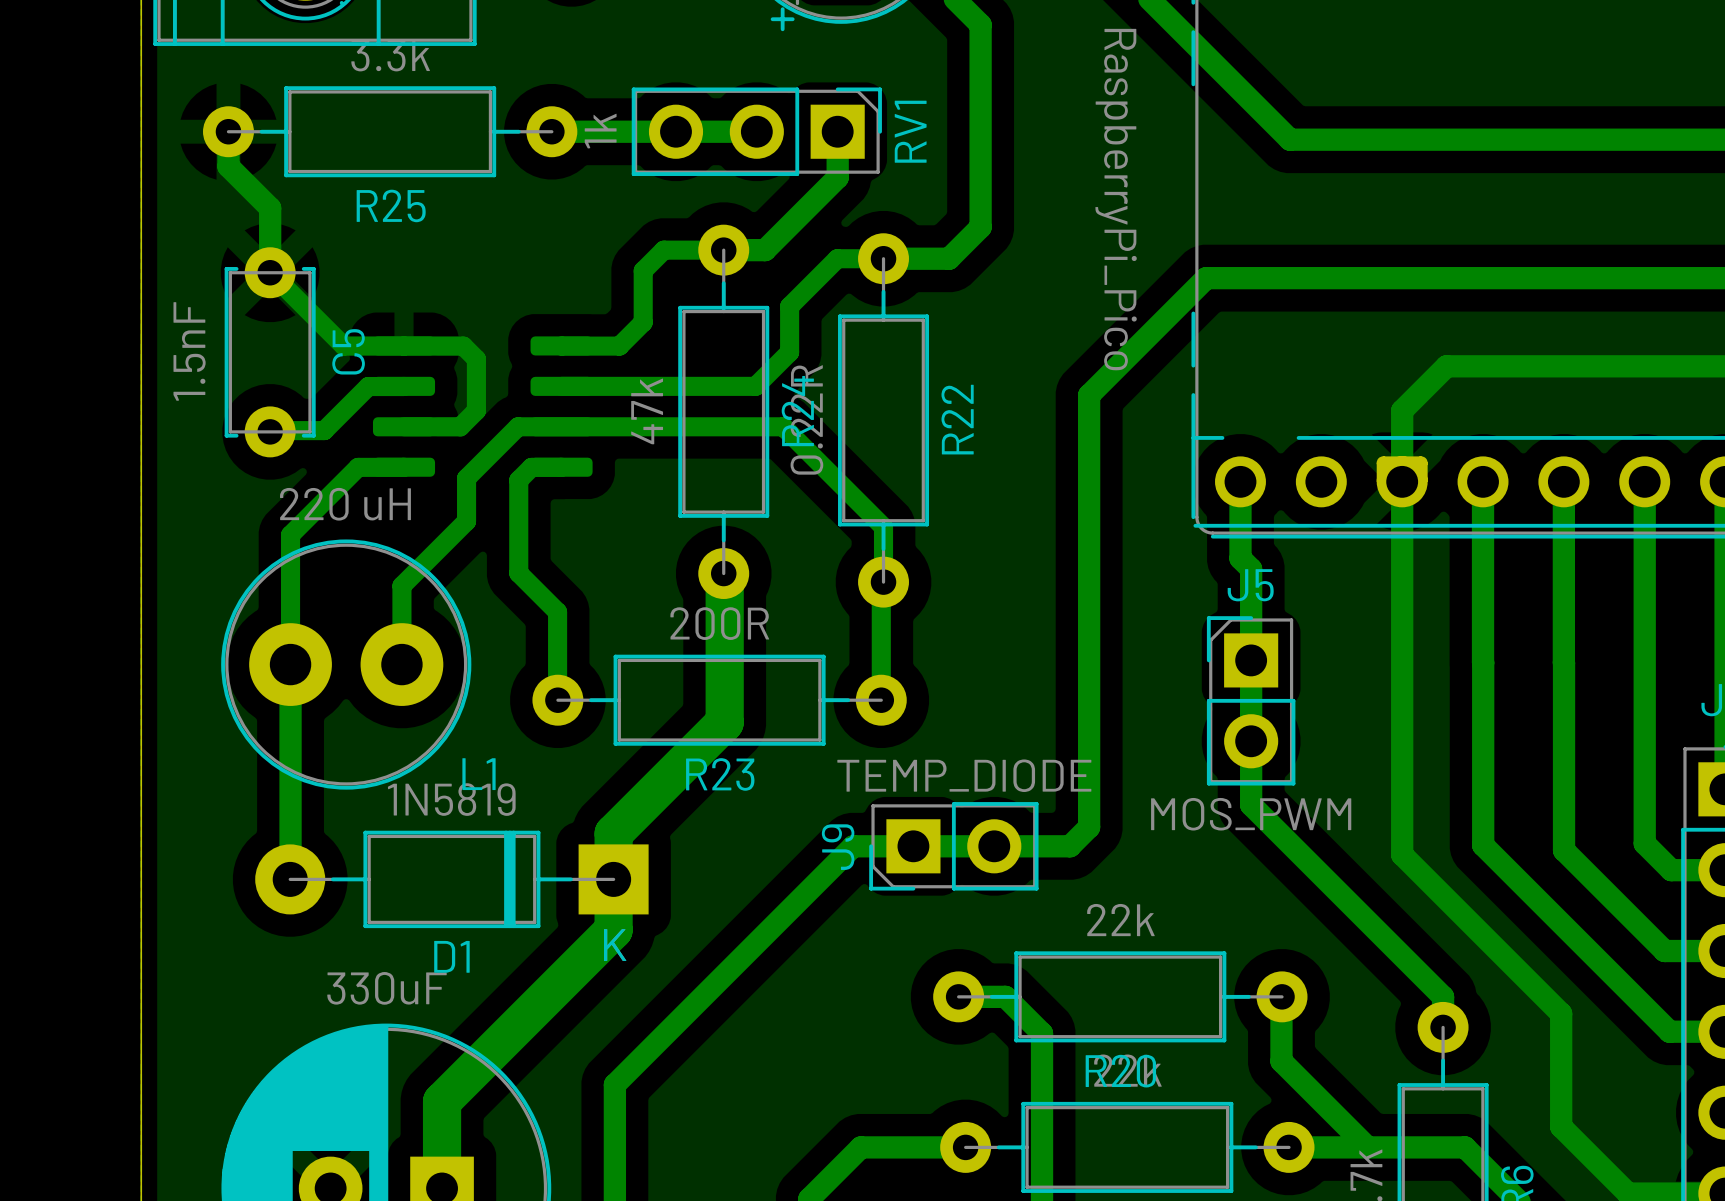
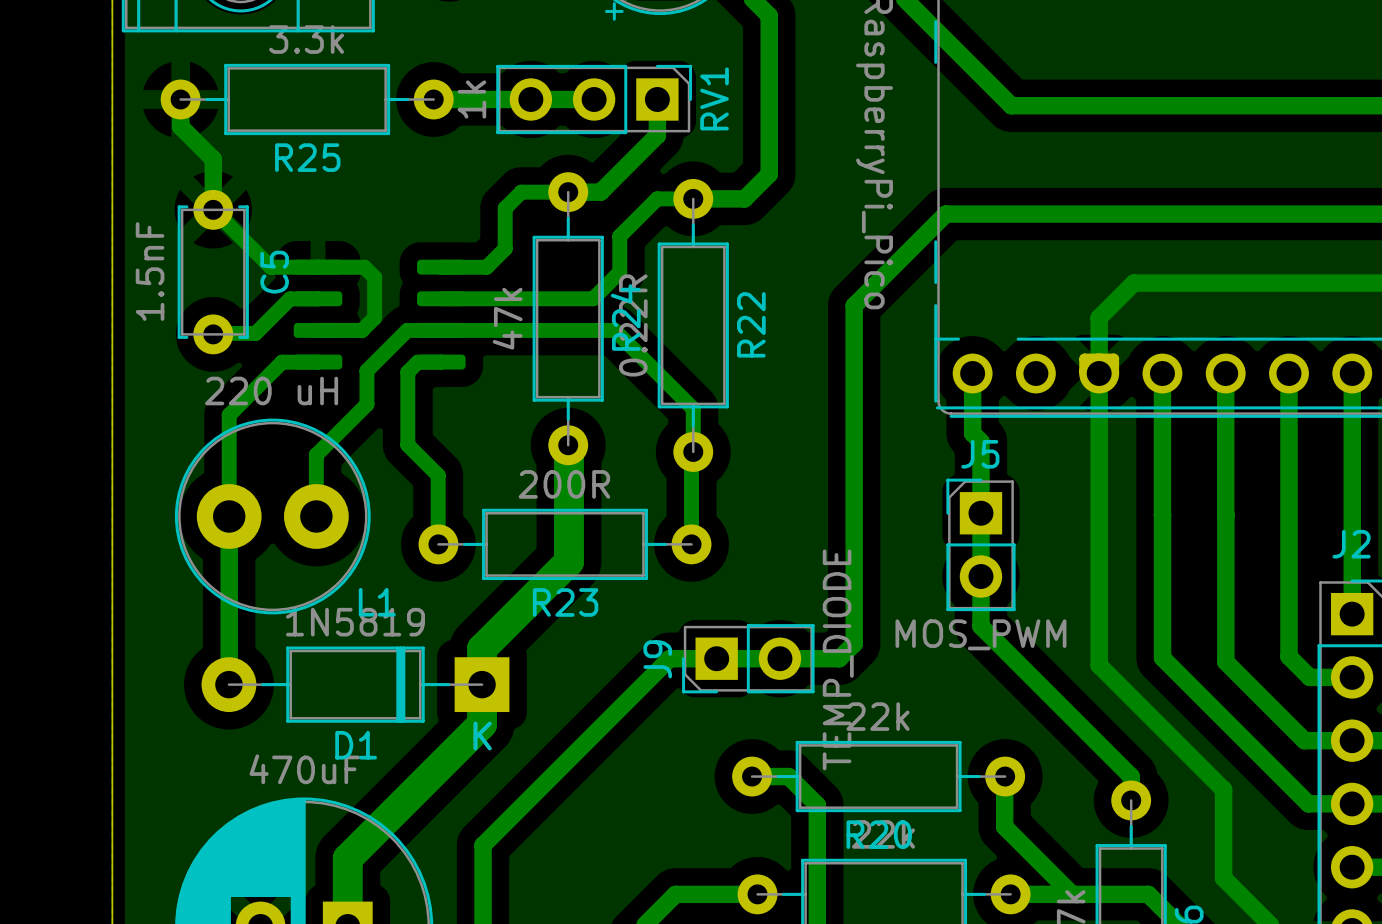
J9 value rotation: 0° (964, 775) -> 90° counterclockwise (838, 659)
part value: 330uF (386, 988) -> 470uF (304, 769)

